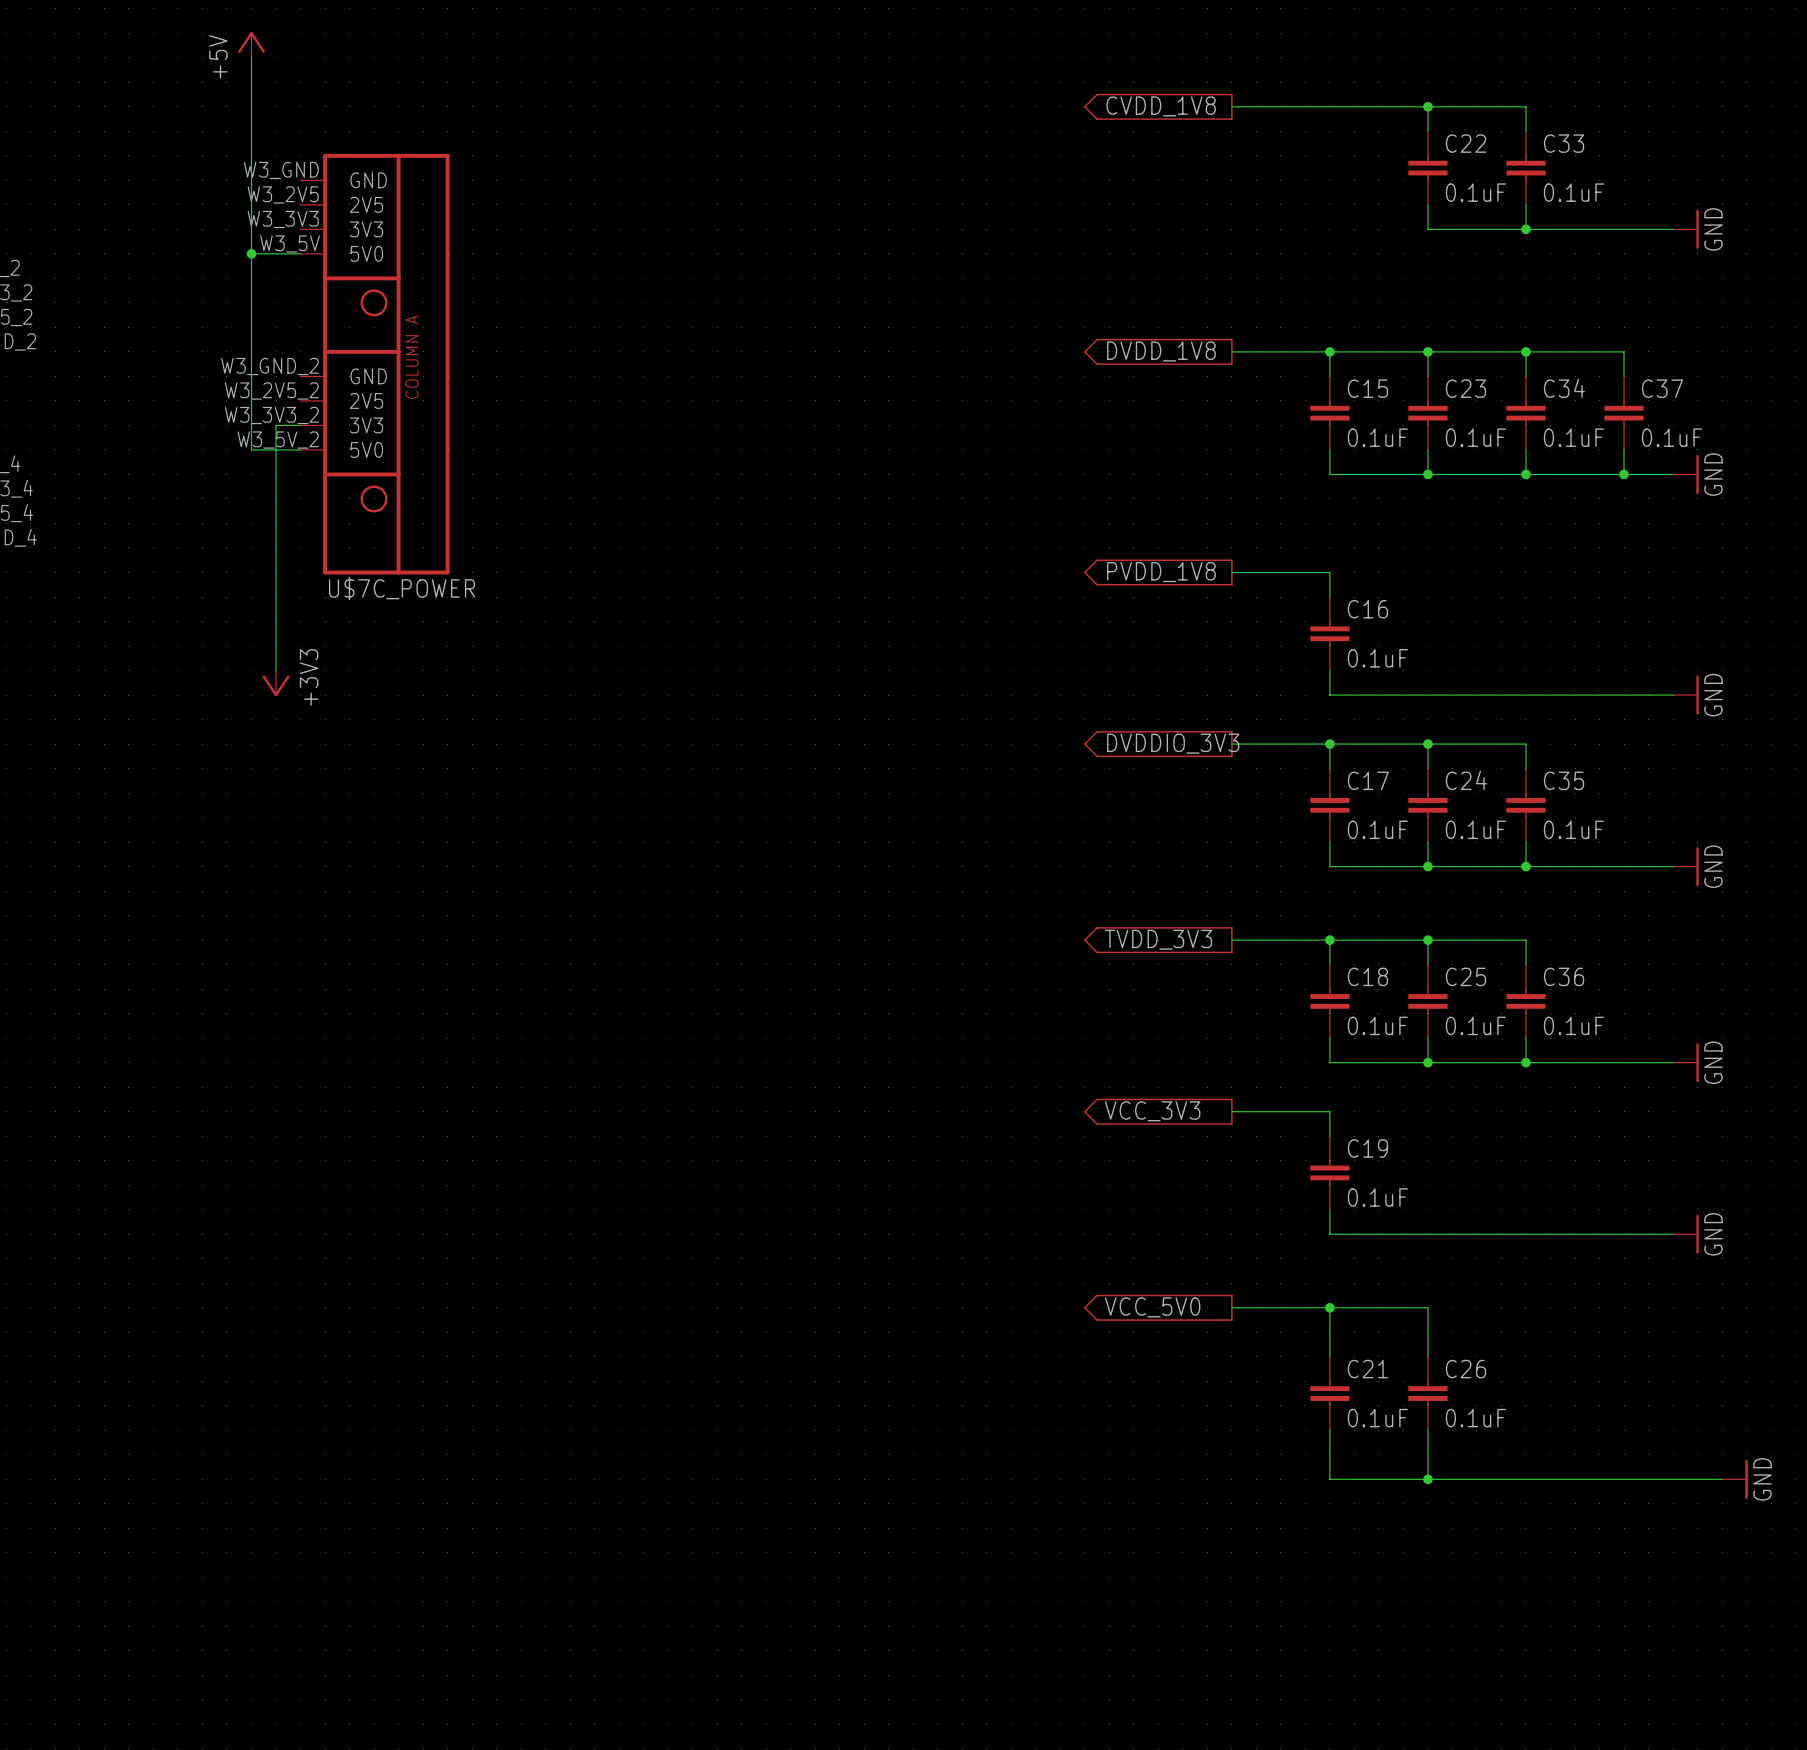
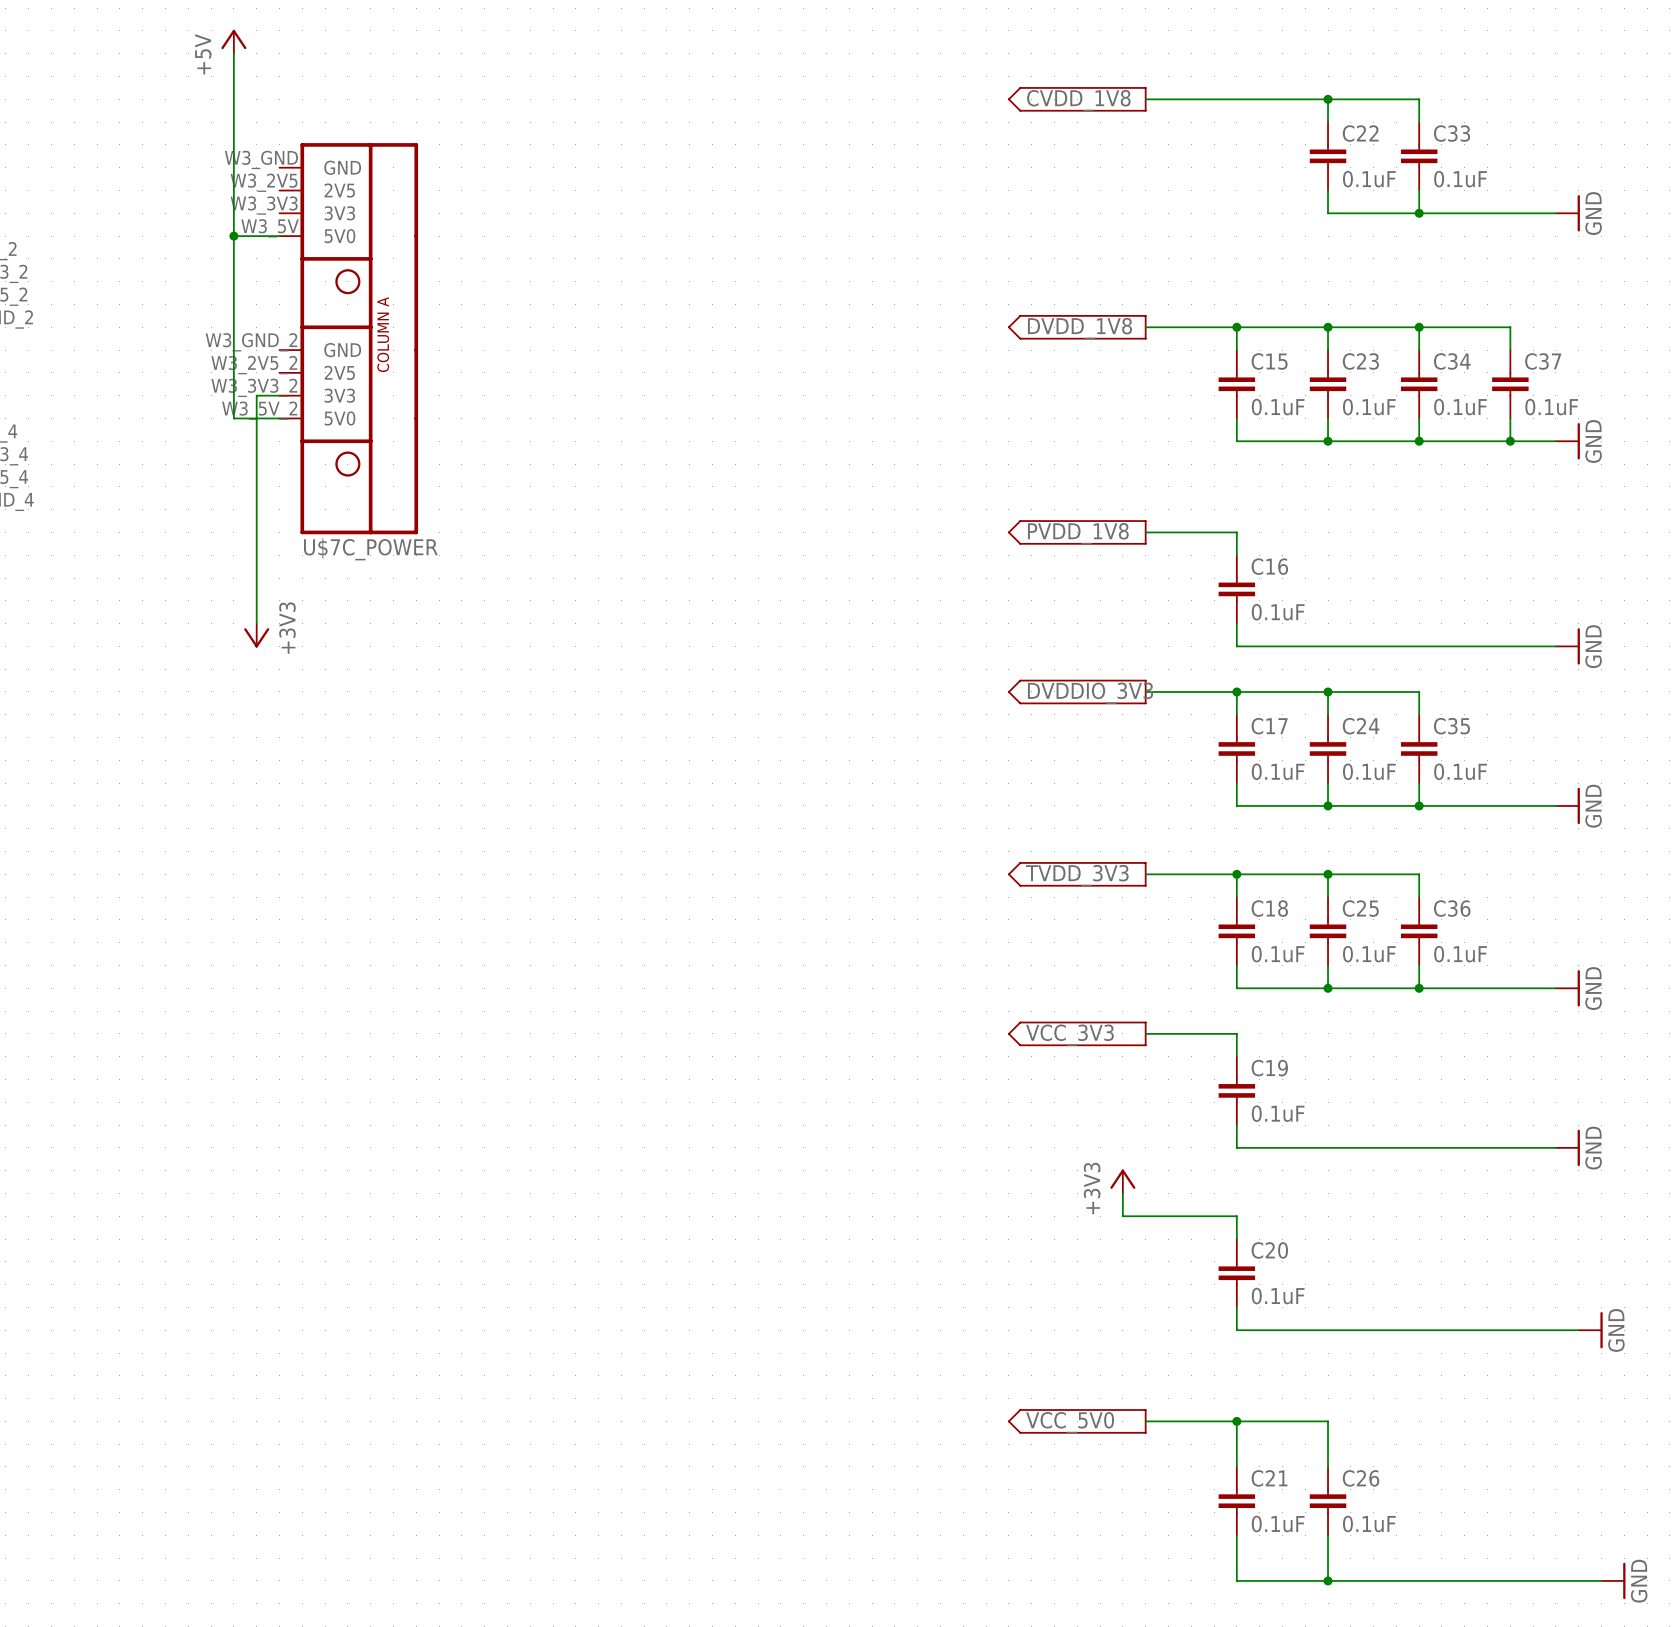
power symbol: none -> +3V3 (1122, 1181)
wire: none -> (1122, 1193) (1122, 1216) (1145, 1216)
part position: (1158, 1307) -> (1077, 1421)
wire: (1329, 1307) (1427, 1307) (1427, 1356) -> none
junction: (1329, 1307) -> none
C20: none -> 0.1uF (1236, 1273)
C21 position: (1329, 1393) -> (1236, 1501)
C26 position: (1427, 1393) -> (1328, 1501)
wire: none -> (1236, 1307) (1236, 1330) (1578, 1330)
wire: (1329, 1430) (1329, 1479) (1722, 1479) -> (1236, 1535) (1236, 1580) (1601, 1580)
wire: (1427, 1430) (1427, 1479) -> (1328, 1535) (1328, 1580)
junction: (1427, 1479) -> none
power symbol position: GND (1734, 1479) -> GND (1590, 1330)
wire: none -> (1145, 1421) (1328, 1421) (1328, 1466)
wire: none -> (1236, 1421) (1236, 1466)
junction: none -> (1236, 1421)
junction: none -> (1328, 1580)
power symbol: none -> GND (1613, 1580)

